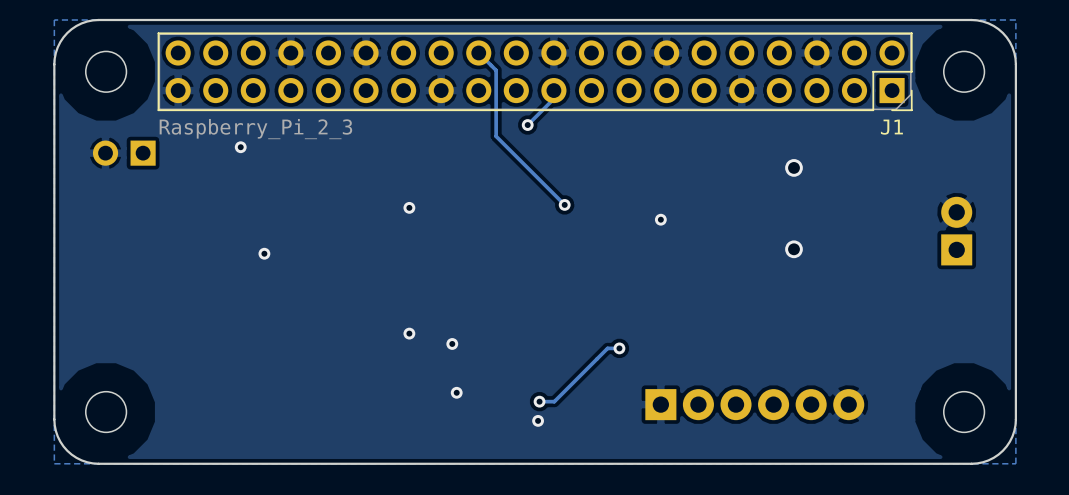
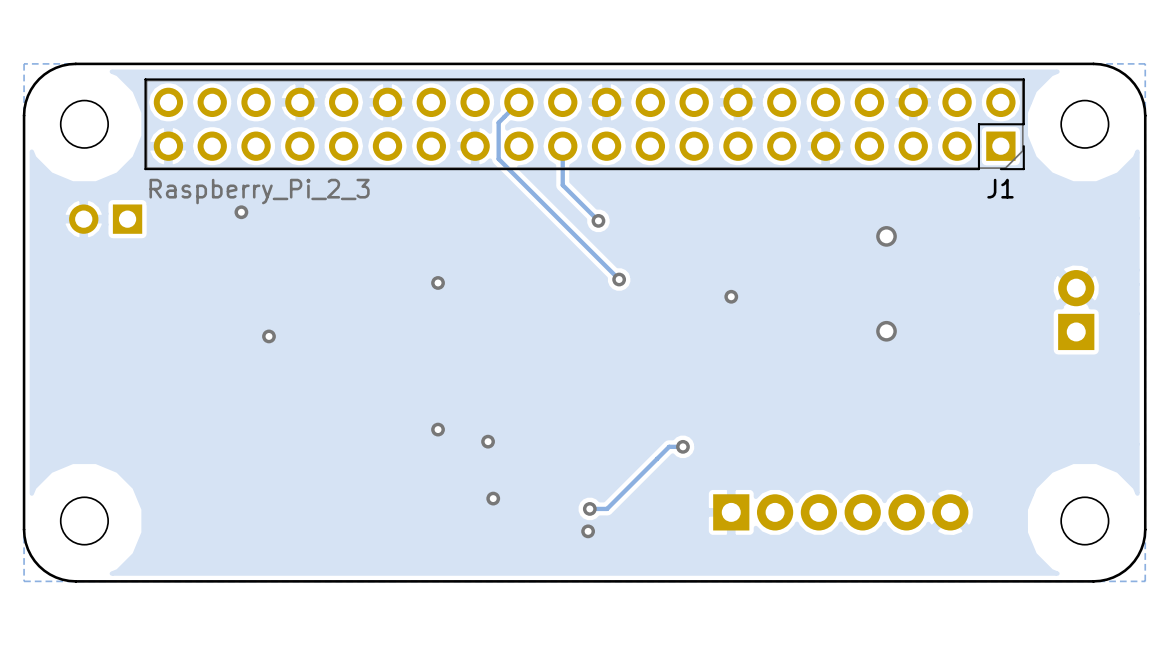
track: (478, 52) (496, 70) (496, 136) -> (518, 102) (498, 122) (498, 159) (539, 199)
track: none -> (562, 146) (562, 185) (598, 220)
track: (553, 90) (553, 98) (527, 125) -> none
via position: (527, 125) -> (598, 220)

